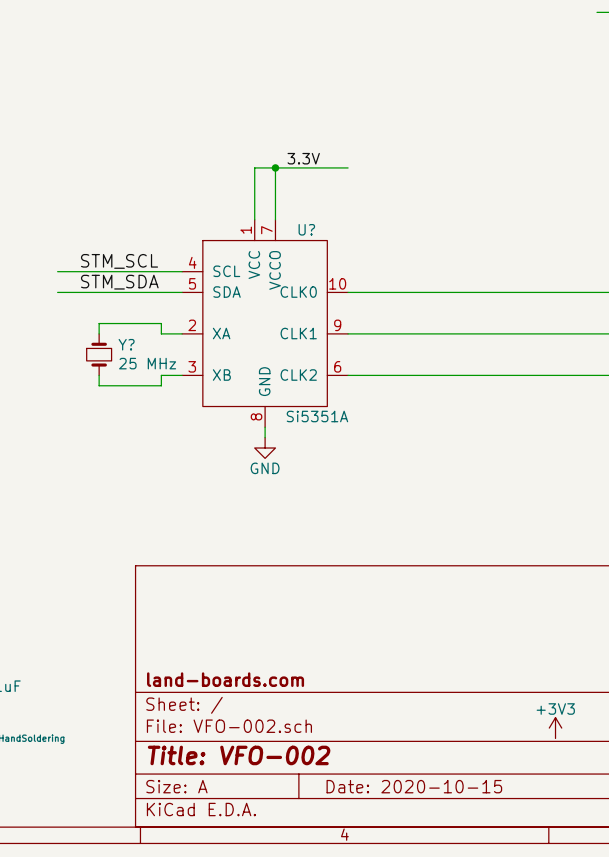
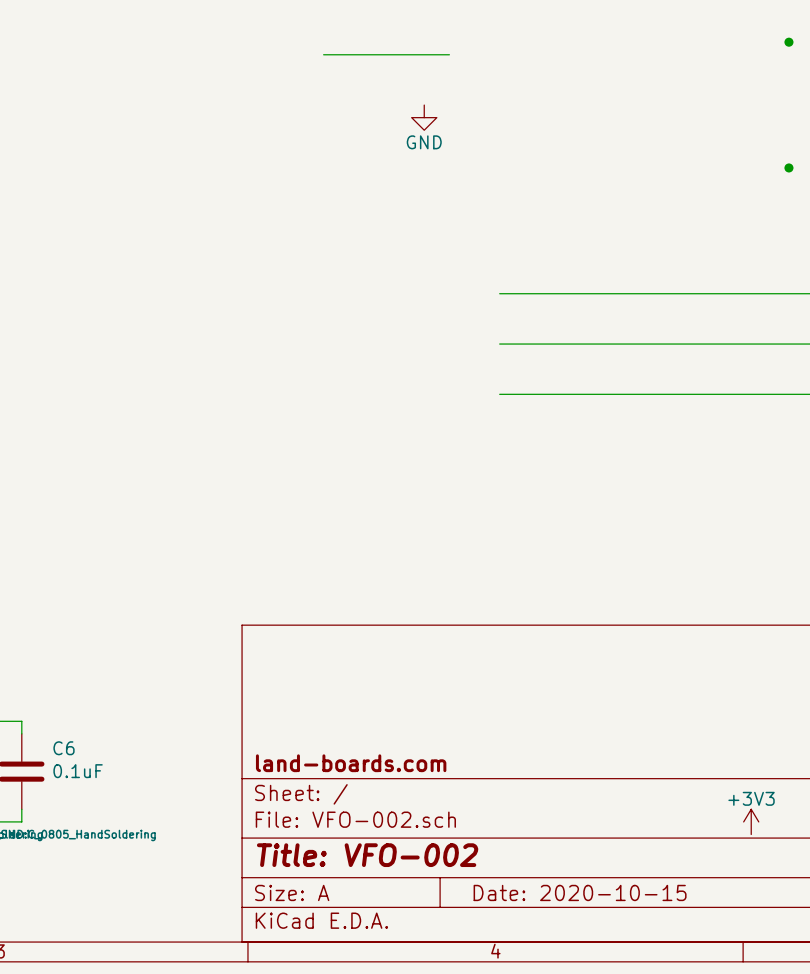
junction: none -> (788, 42)
wire: none -> (323, 54) (449, 54)
power symbol: none -> GND (424, 117)
label: 3.3V (303, 158) -> none
wire: (275, 167) (275, 219) -> none
junction: (275, 167) -> none
wire: (348, 167) (254, 167) (254, 219) -> none
junction: none -> (788, 167)
label: STM_SCL (119, 261) -> none
wire: (57, 271) (182, 271) -> none
label: STM_SDA (119, 282) -> none
wire: (57, 292) (182, 292) -> none
U?: Si5351A (265, 323) -> none
wire: (99, 333) (99, 323) (161, 323) (161, 333) (182, 333) -> none
Y?: 25 MHz (99, 354) -> none
wire: (99, 375) (99, 385) (161, 385) (161, 375) (182, 375) -> none
wire: (265, 427) (265, 437) -> none
power symbol: GND (265, 448) -> none

